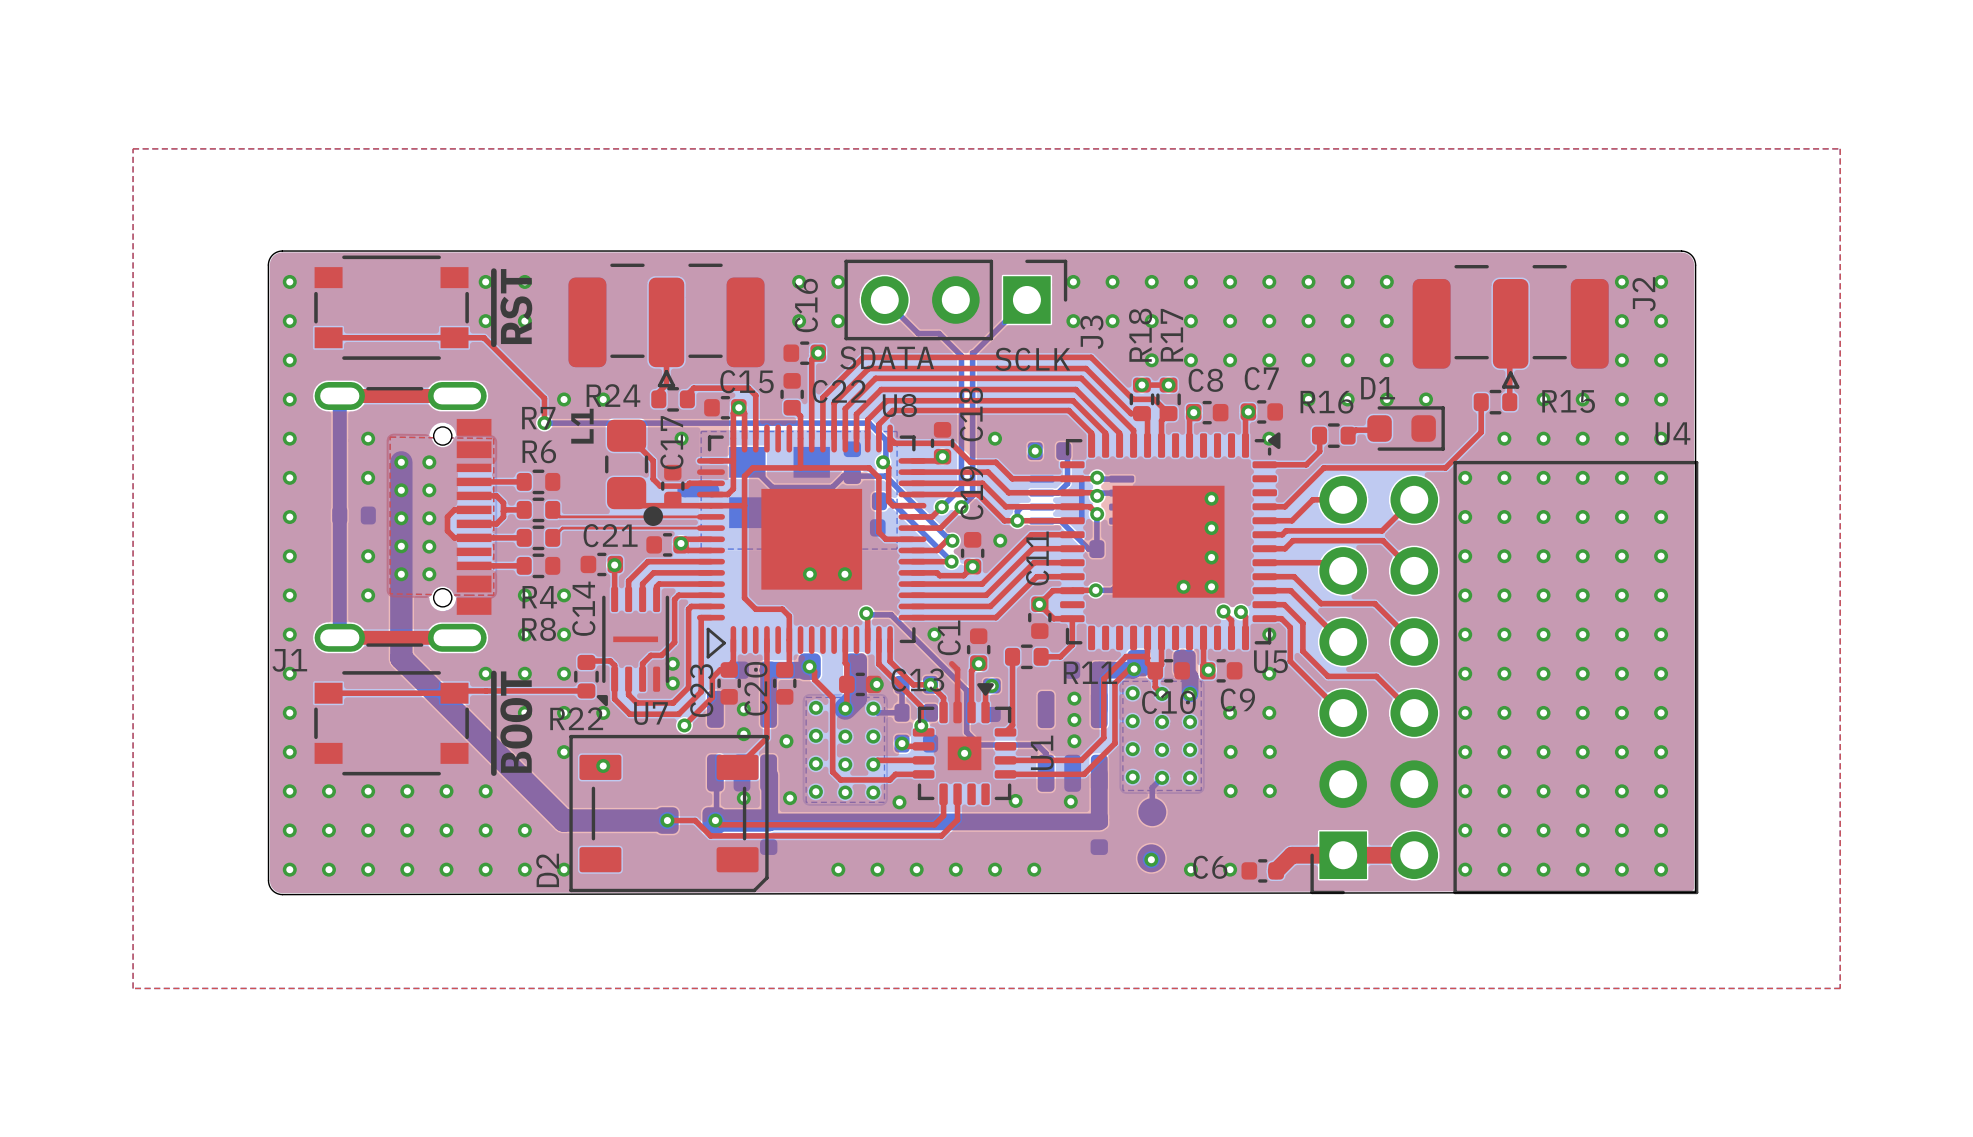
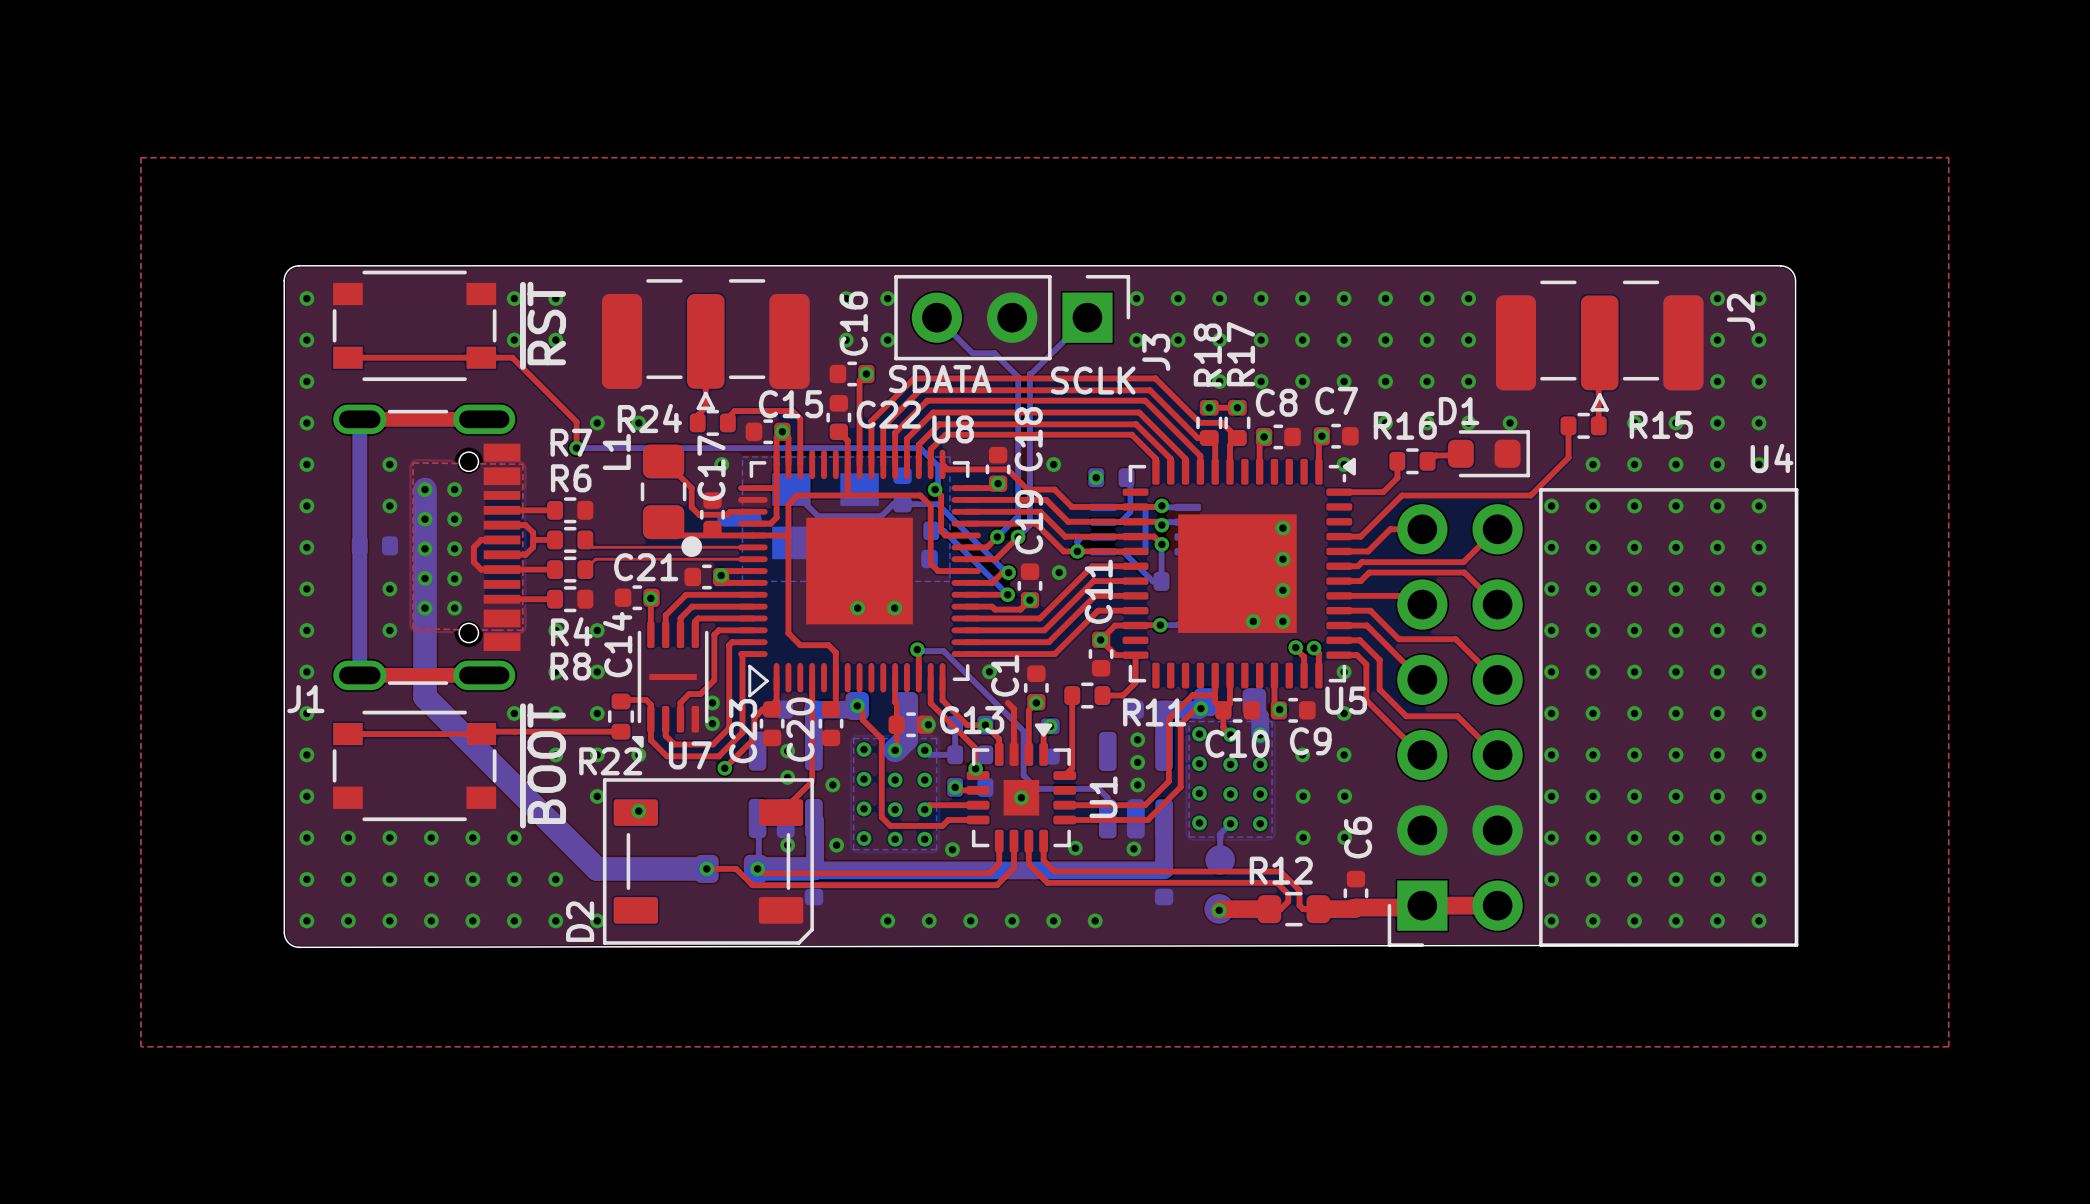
top track: none -> (1028, 841) (1028, 864) (1047, 882) (1276, 882) (1288, 894) (1288, 901) (1280, 909) (1269, 909)
top track: none -> (1043, 841) (1043, 860) (1054, 871) (1280, 871) (1299, 890) (1299, 905) (1303, 909) (1318, 909)
top track: (1342, 855) (1291, 855) (1276, 870) -> (1422, 905) (1420, 907) (1320, 909)
top track: none -> (1271, 909) (1219, 910)
R12: none -> (1293, 909)
via: (1190, 869) -> none
via: (1230, 869) -> none
C6 rotation: 0° (1262, 870) -> 90° clockwise (1355, 893)
C6 position: (1262, 870) -> (1355, 893)

